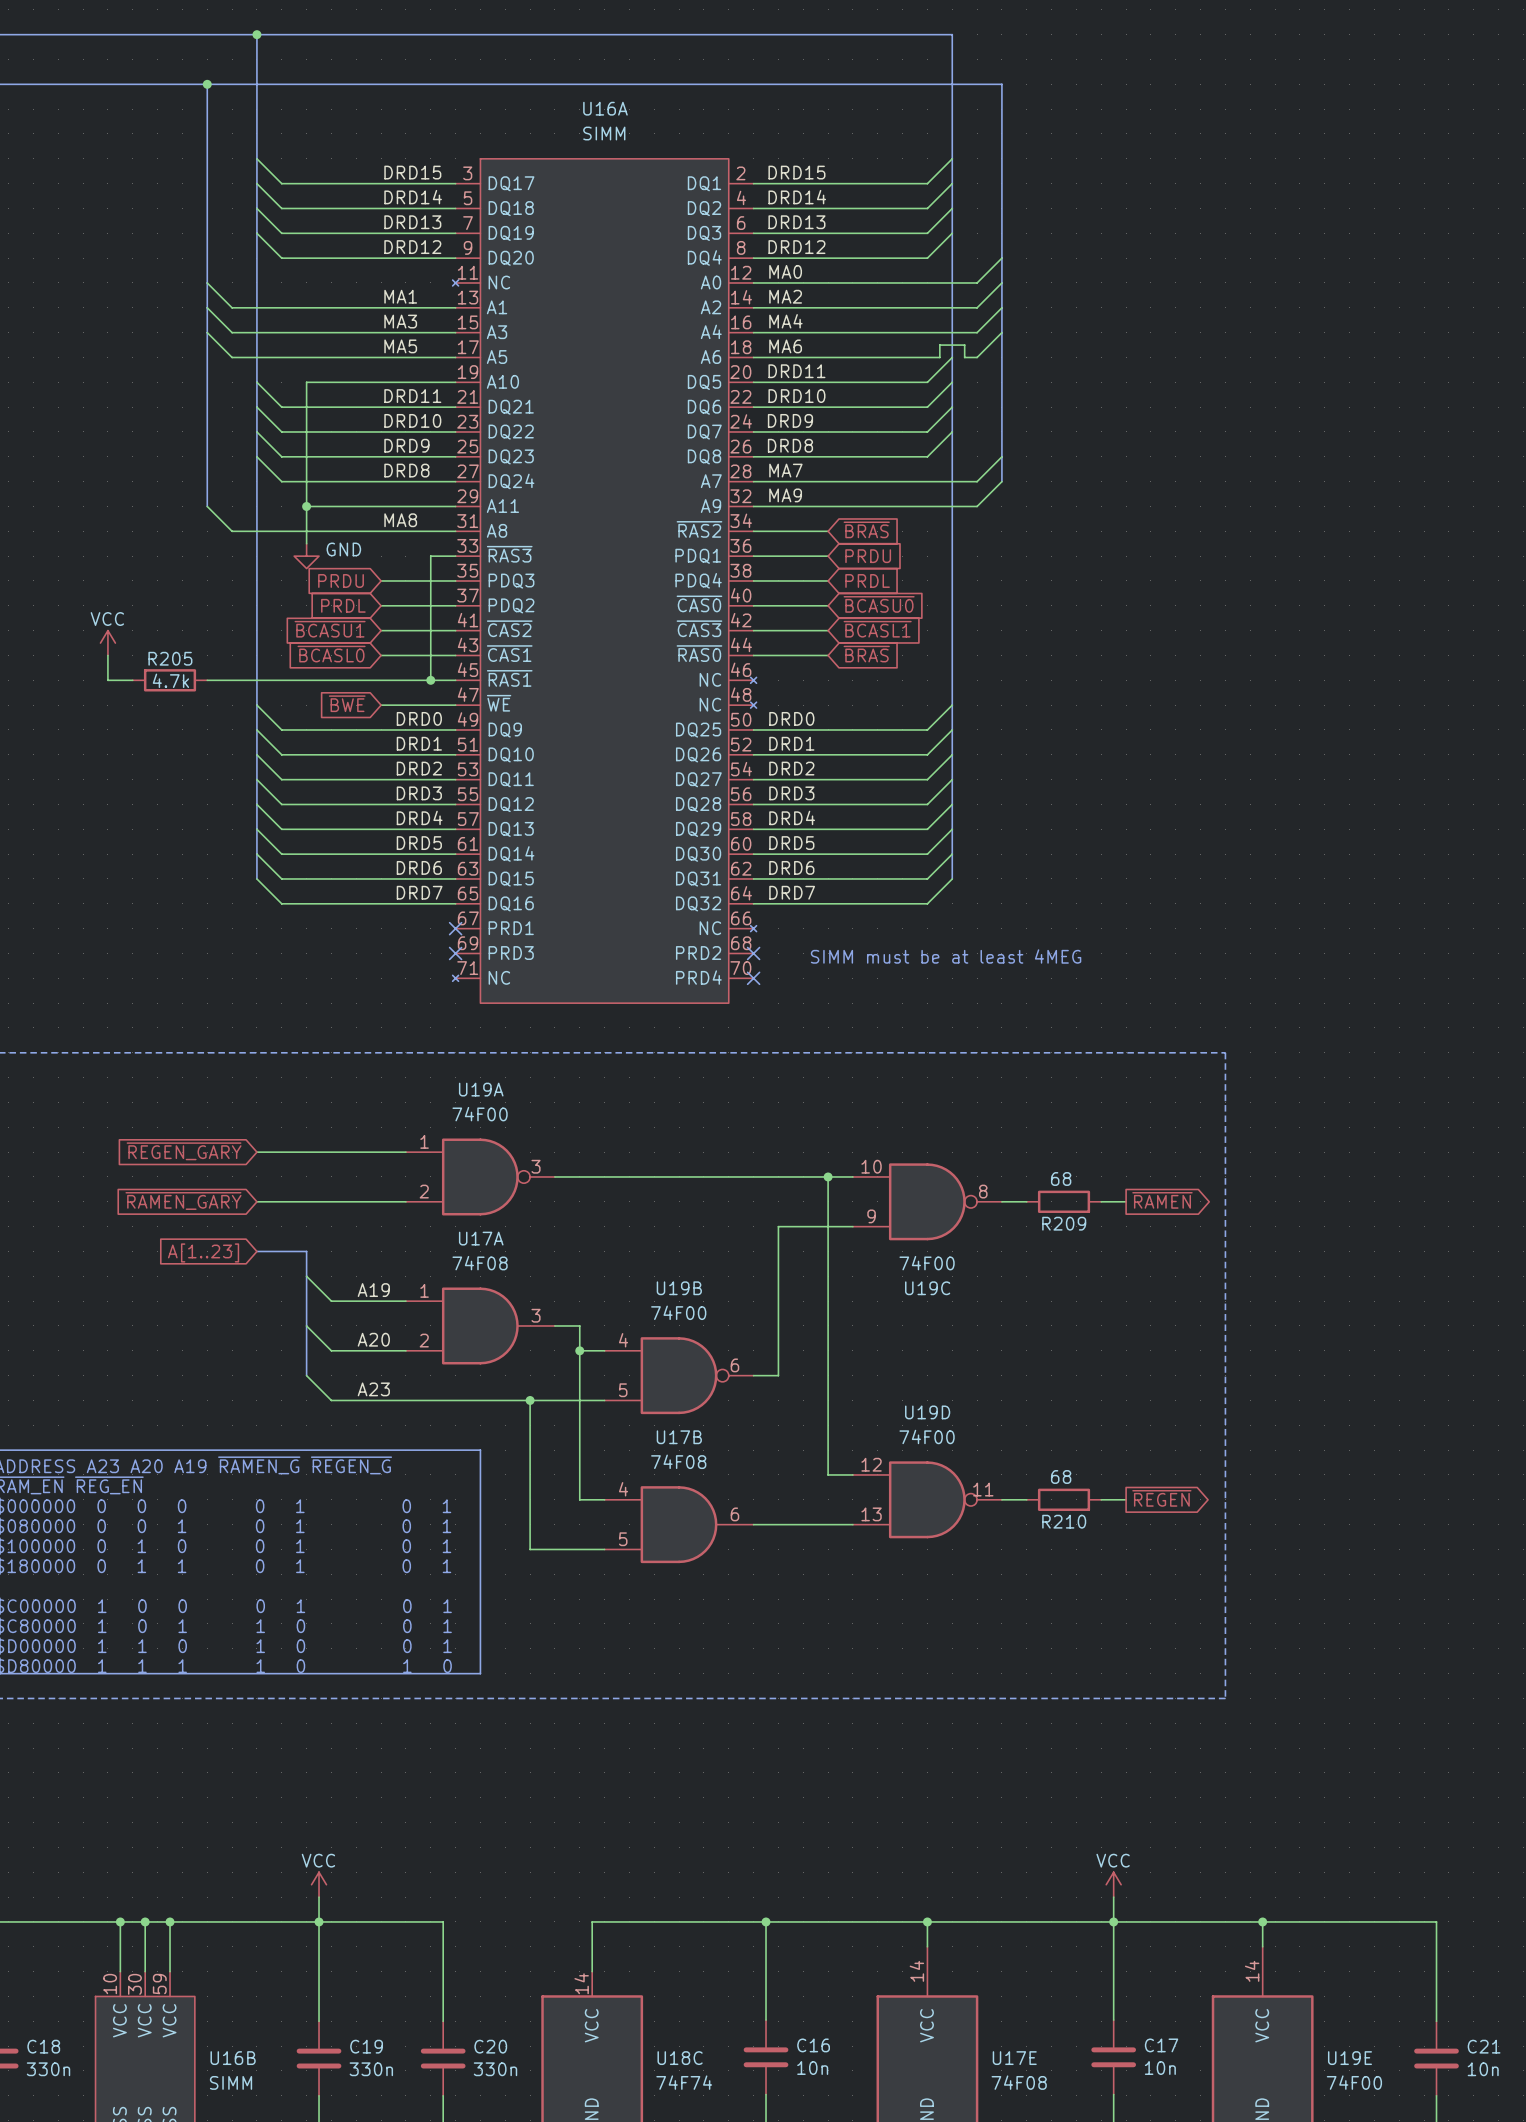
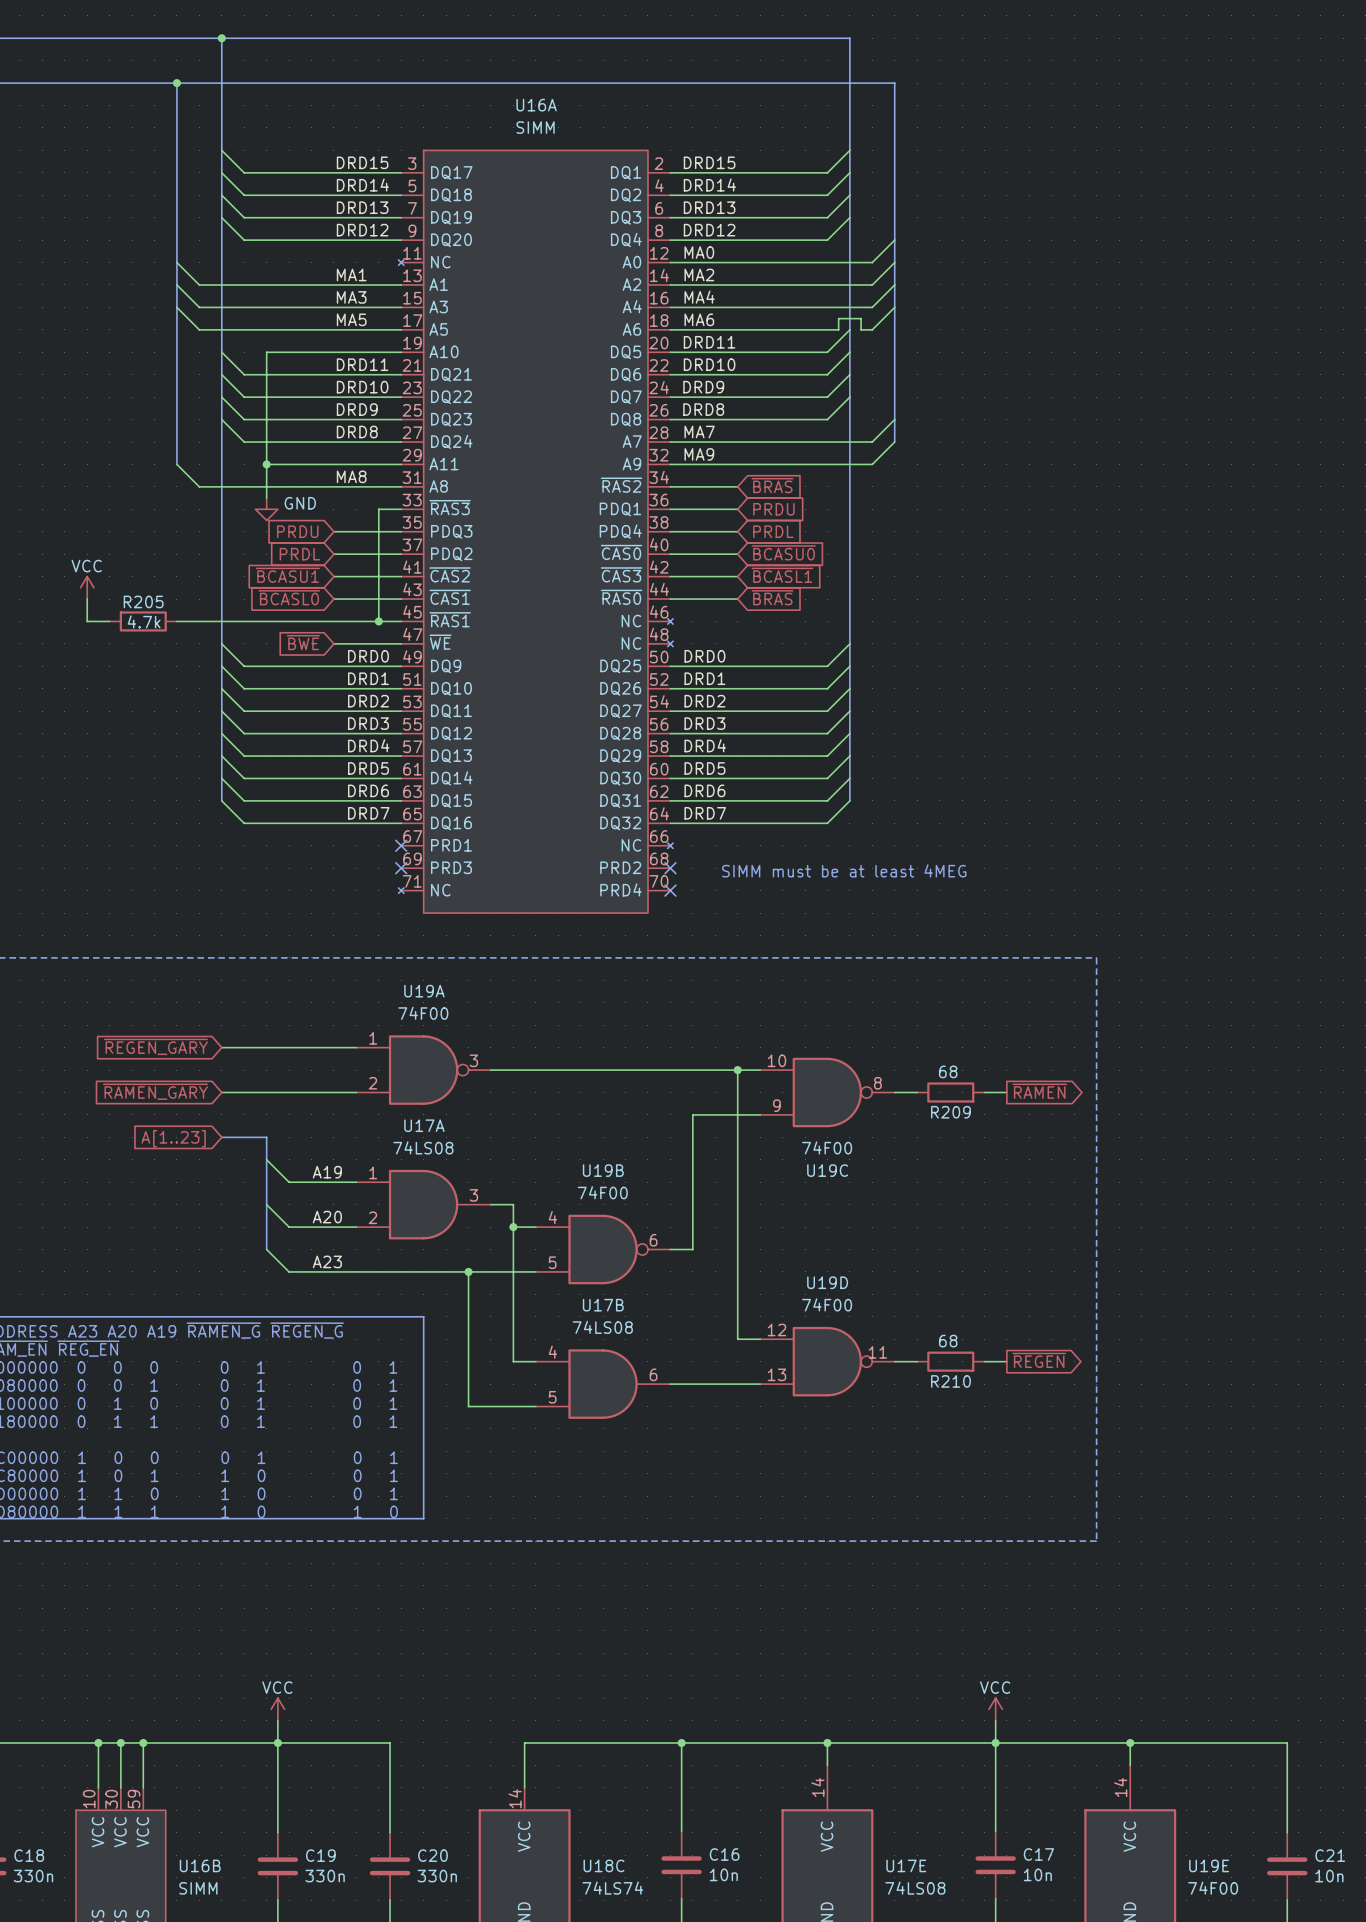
U17A value: 74F08 (480, 1263) -> 74LS08 (423, 1147)
U17B value: 74F08 (678, 1461) -> 74LS08 (602, 1327)
U18C value: 74F74 (684, 2082) -> 74LS74 (612, 1888)
U17E value: 74F08 (1019, 2082) -> 74LS08 (915, 1888)

